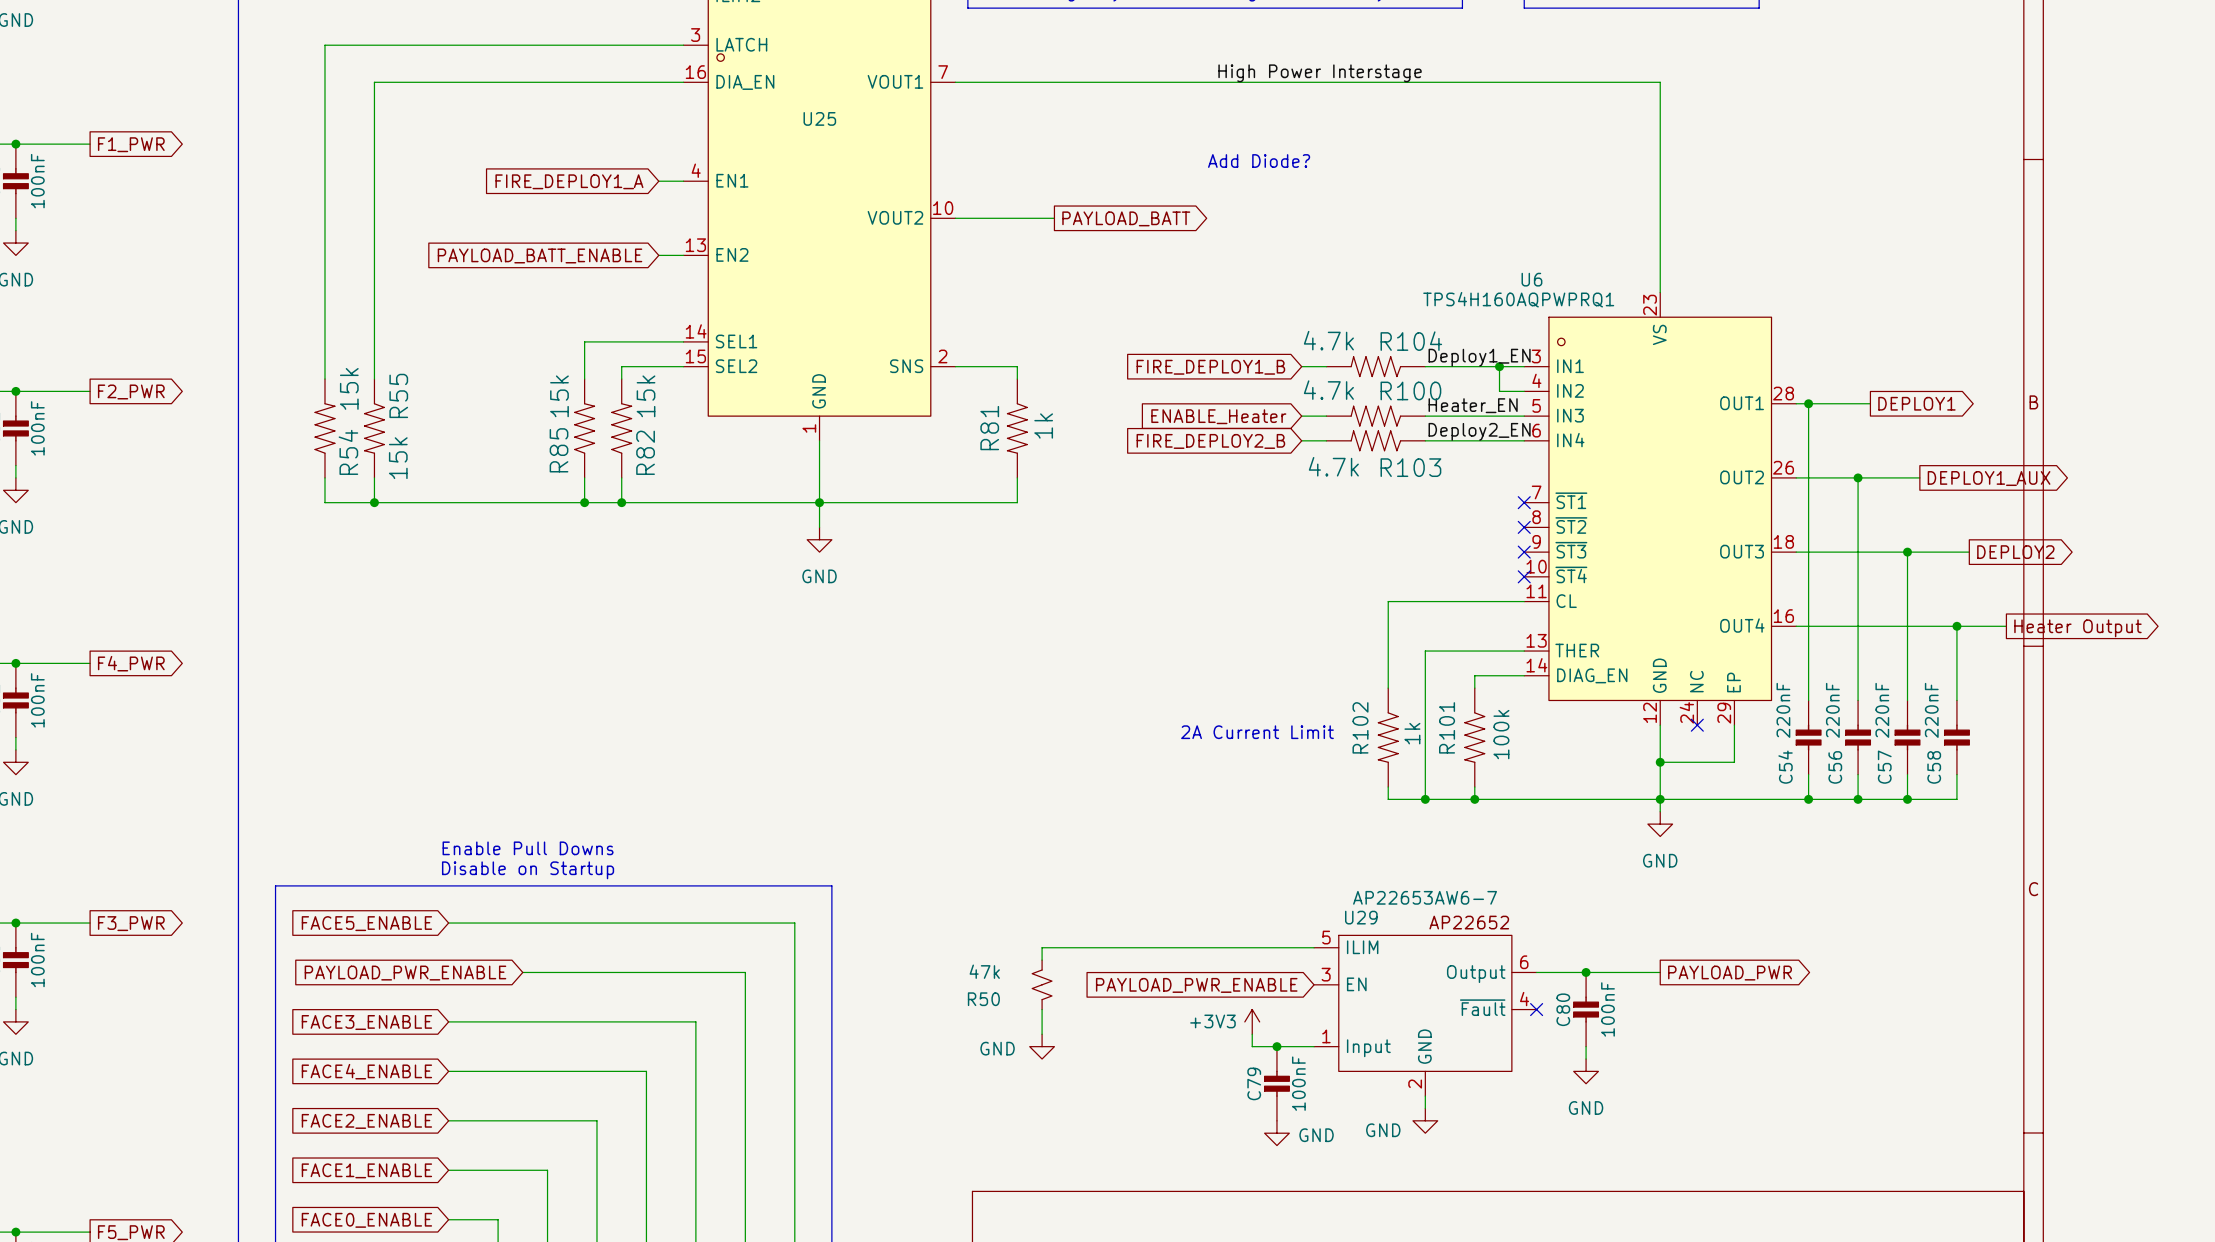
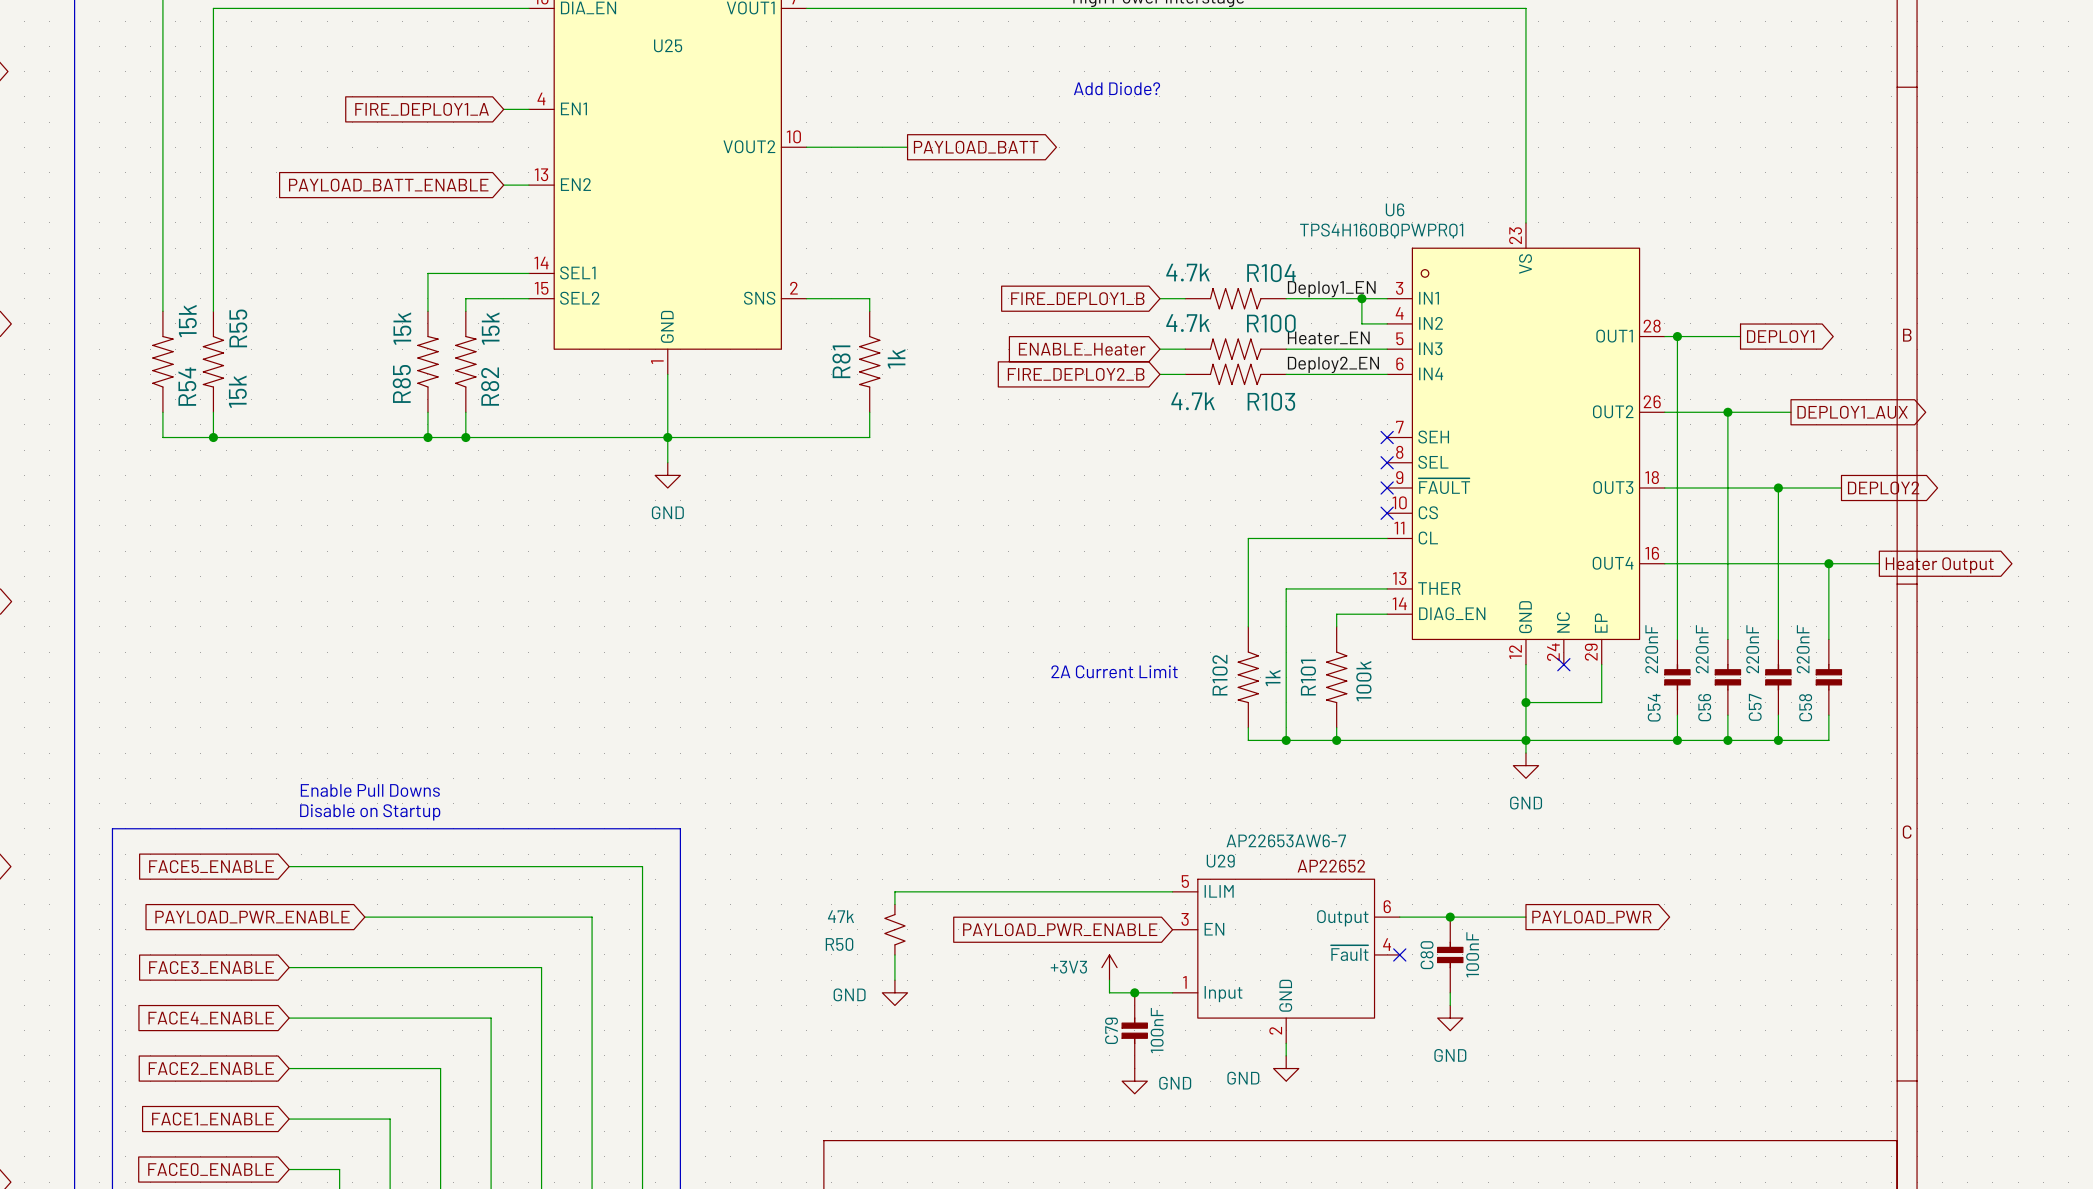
U6 value: TPS4H160AQPWPRQ1 (1518, 299) -> TPS4H160BQPWPRQ1 (1381, 231)
U6 pin name: ~{ST1} (1571, 500) -> SEH (1433, 437)
U6 pin name: ~{ST2} (1571, 525) -> SEL (1433, 462)
U6 pin name: ~{ST3} (1571, 550) -> ~{FAULT} (1444, 486)
U6 pin name: ~{ST4} (1571, 574) -> CS (1428, 512)

